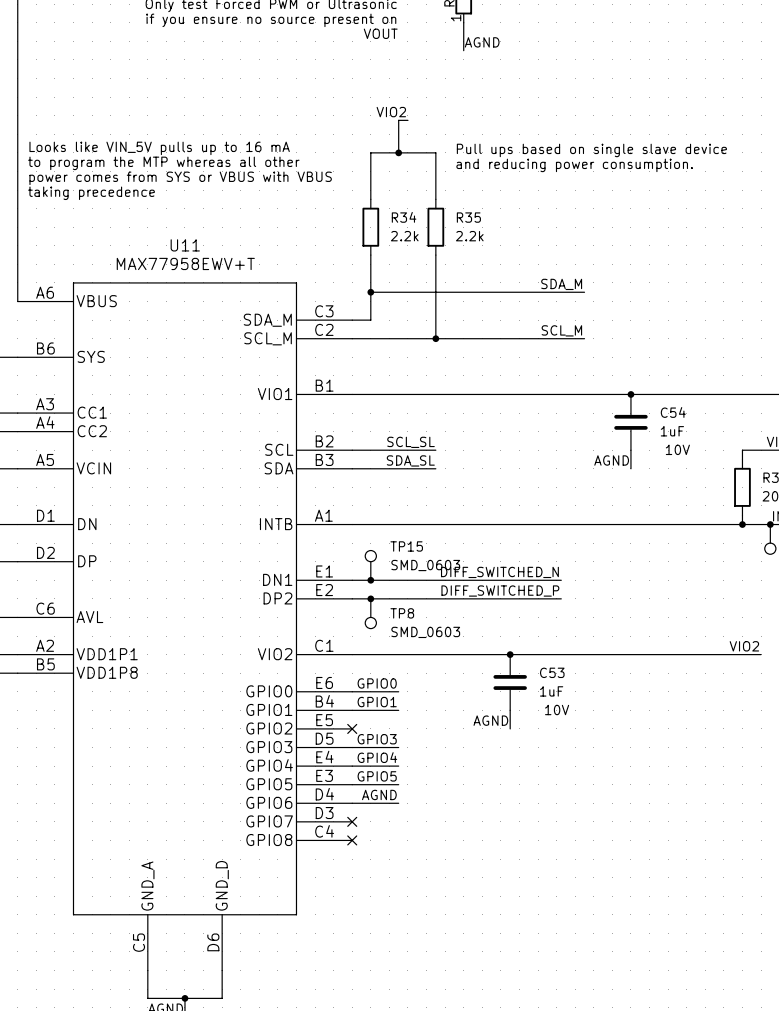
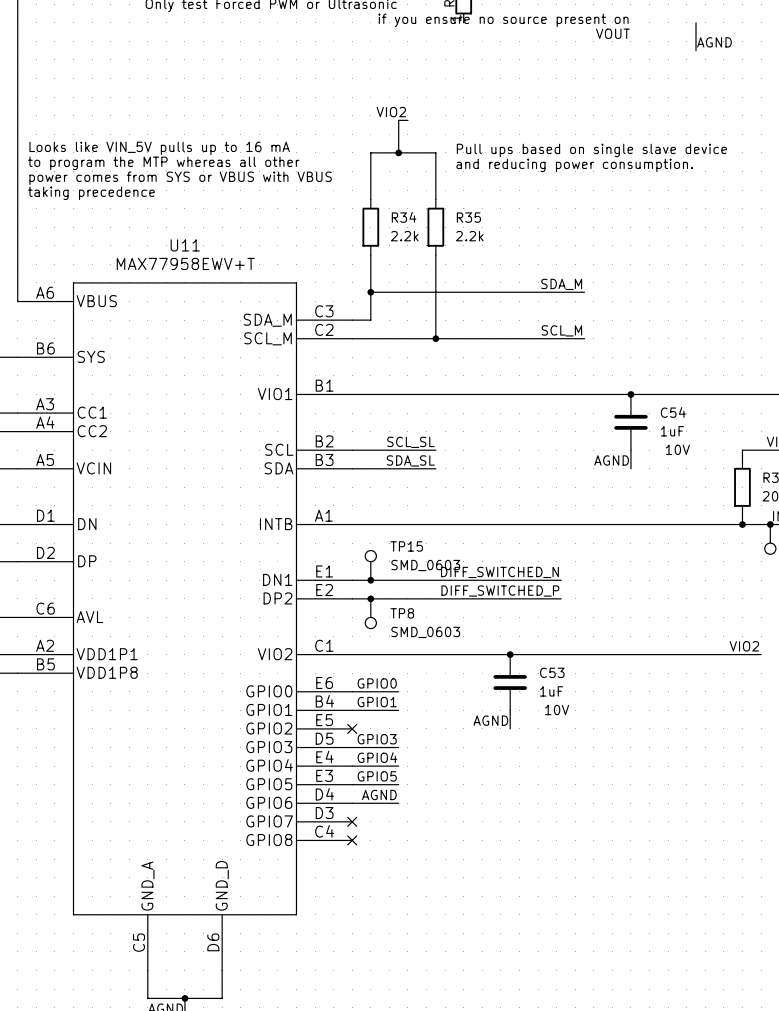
text: if you ensure no source present on (271, 20) -> none
text: none -> if you ensure no source present on (503, 20)
wire: (463, 22) (463, 50) -> none
wire: none -> (696, 22) (696, 50)
text: VOUT (380, 33) -> none
text: none -> VOUT (612, 33)
label: AGND (482, 42) -> none
label: none -> AGND (714, 42)

